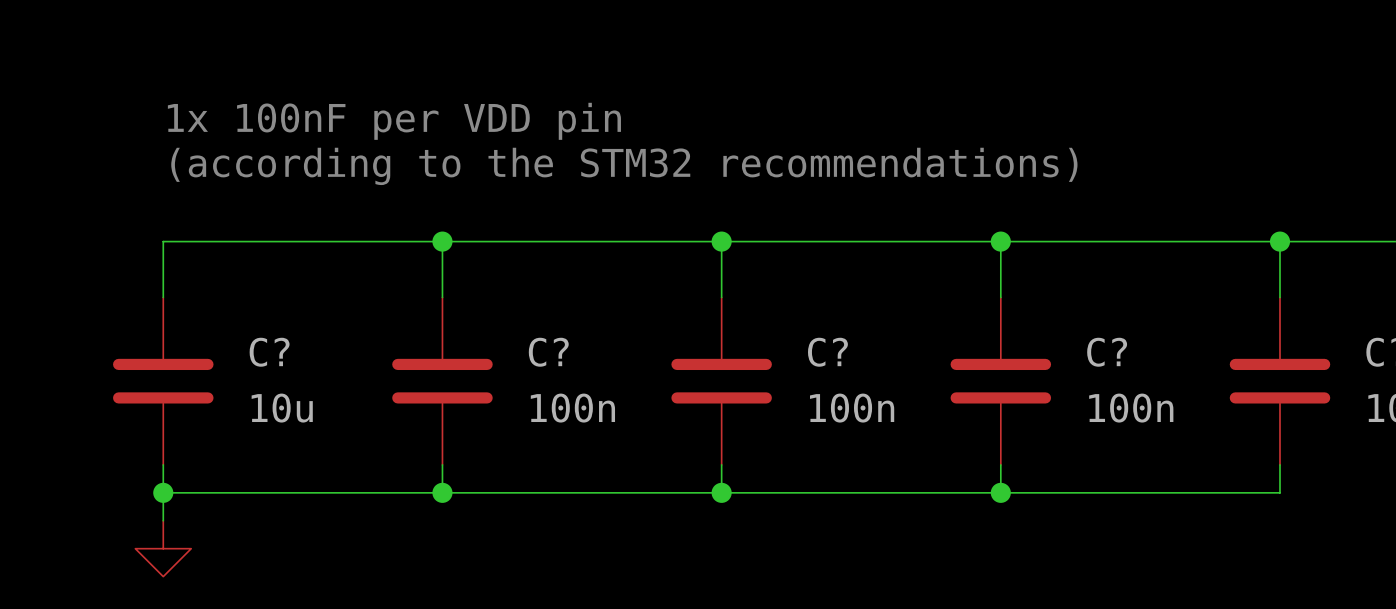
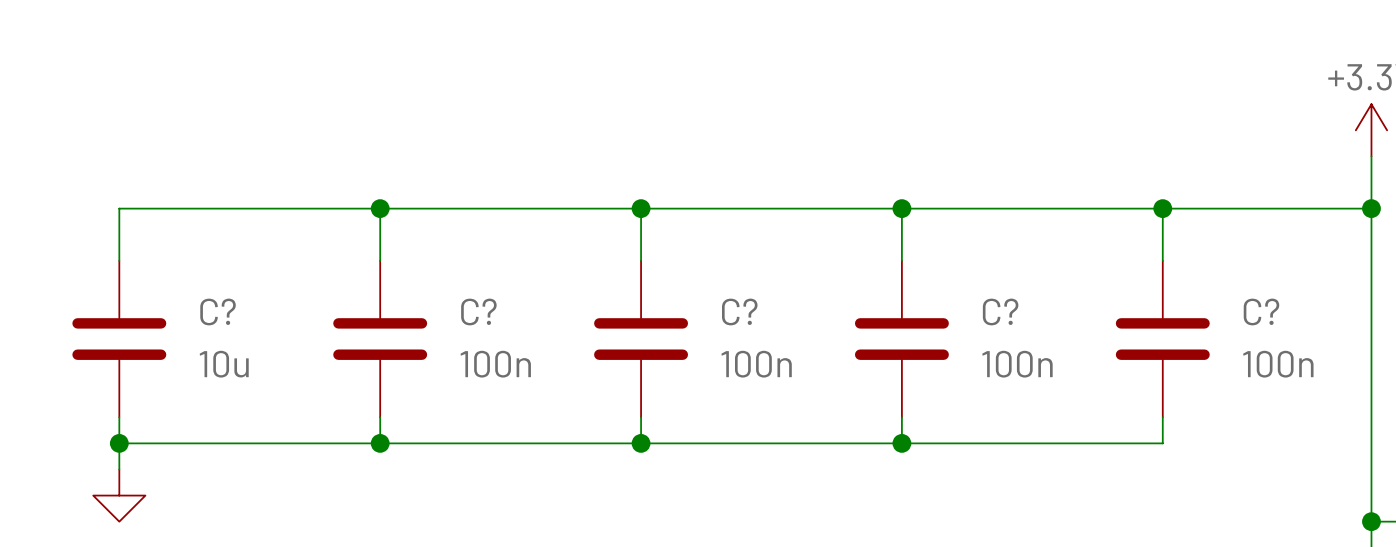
text: 1x 100nF per VDD pin (394, 121) -> none
text: (according to the STM32 recommendations) (624, 166) -> none

